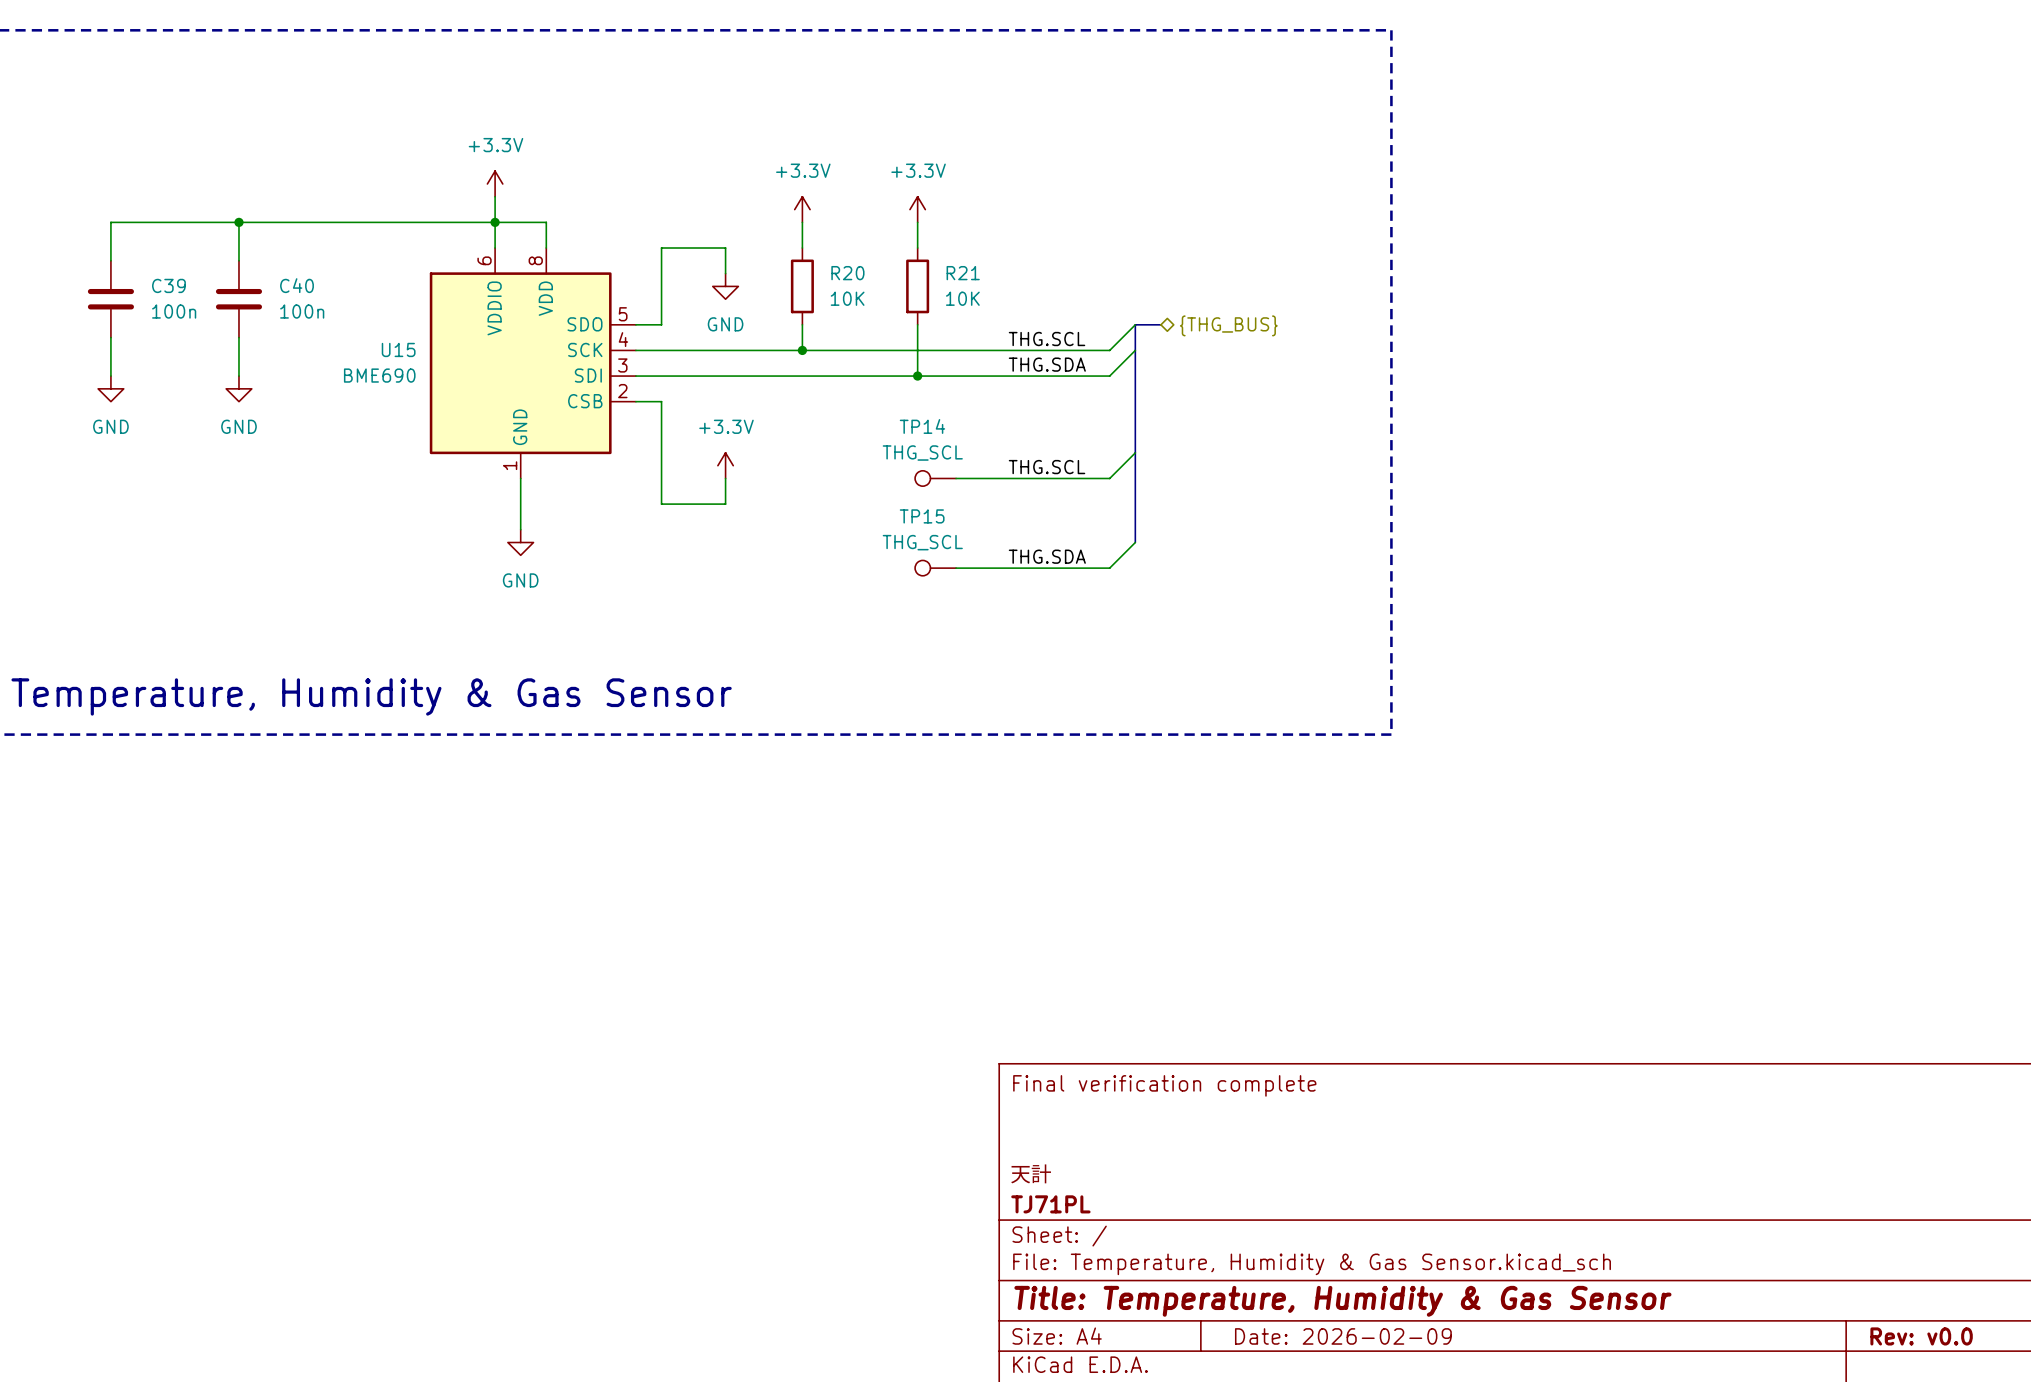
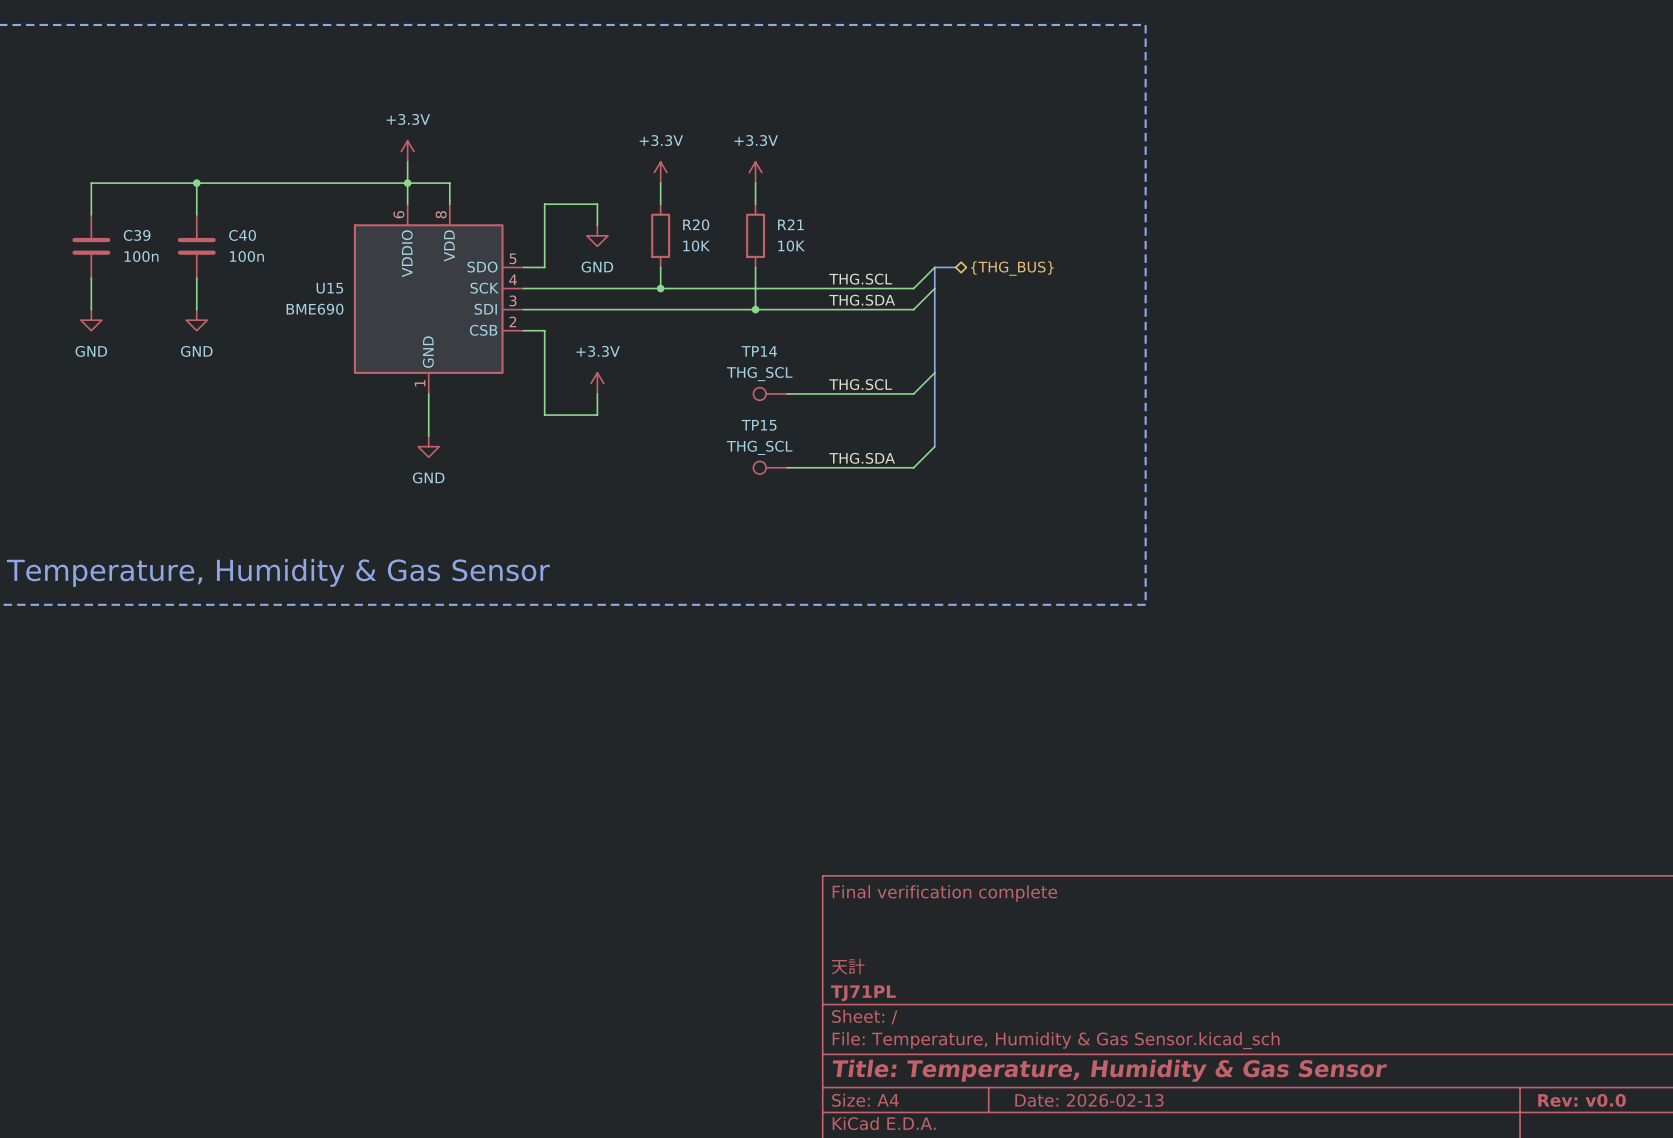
title block: Date: 2026-02-09 (1343, 1336) -> Date: 2026-02-13 (1089, 1100)

